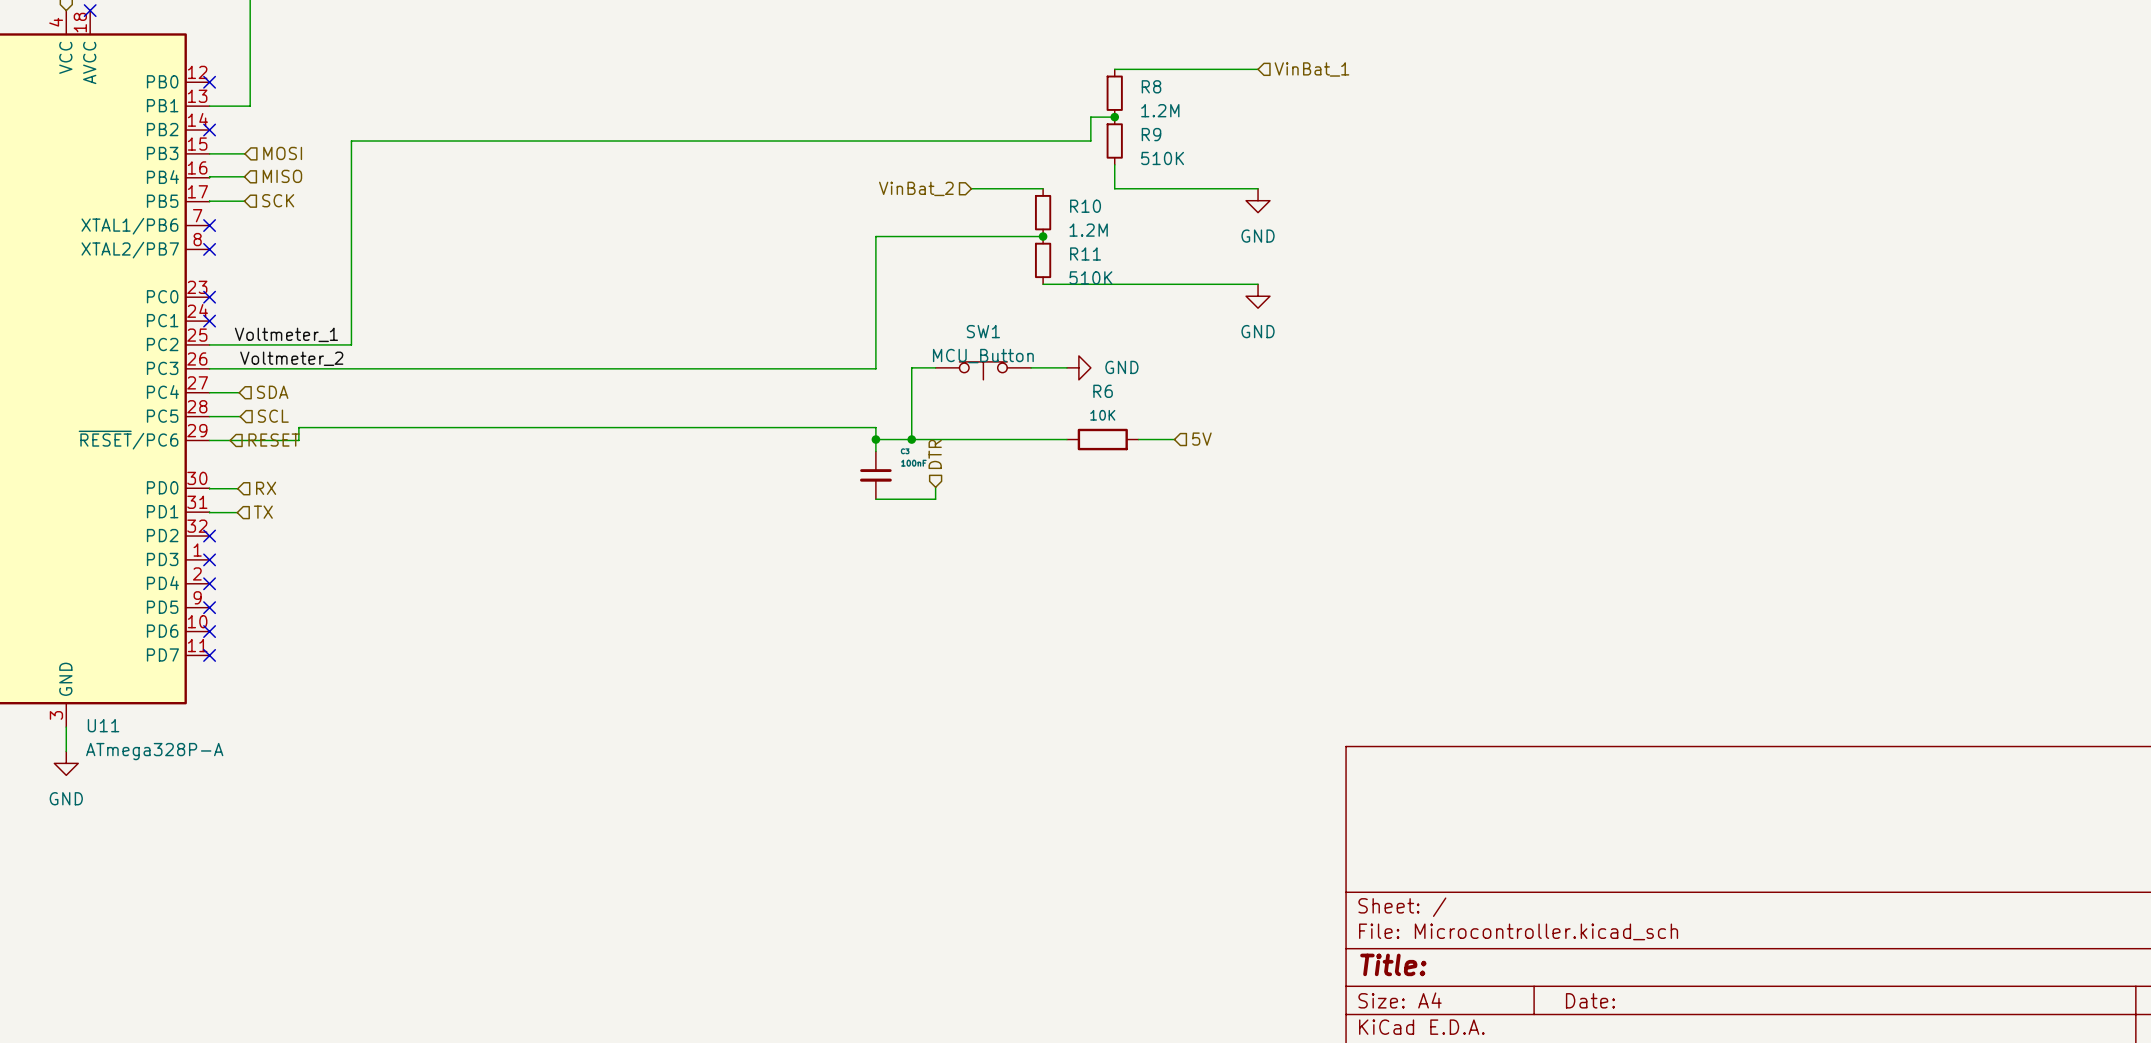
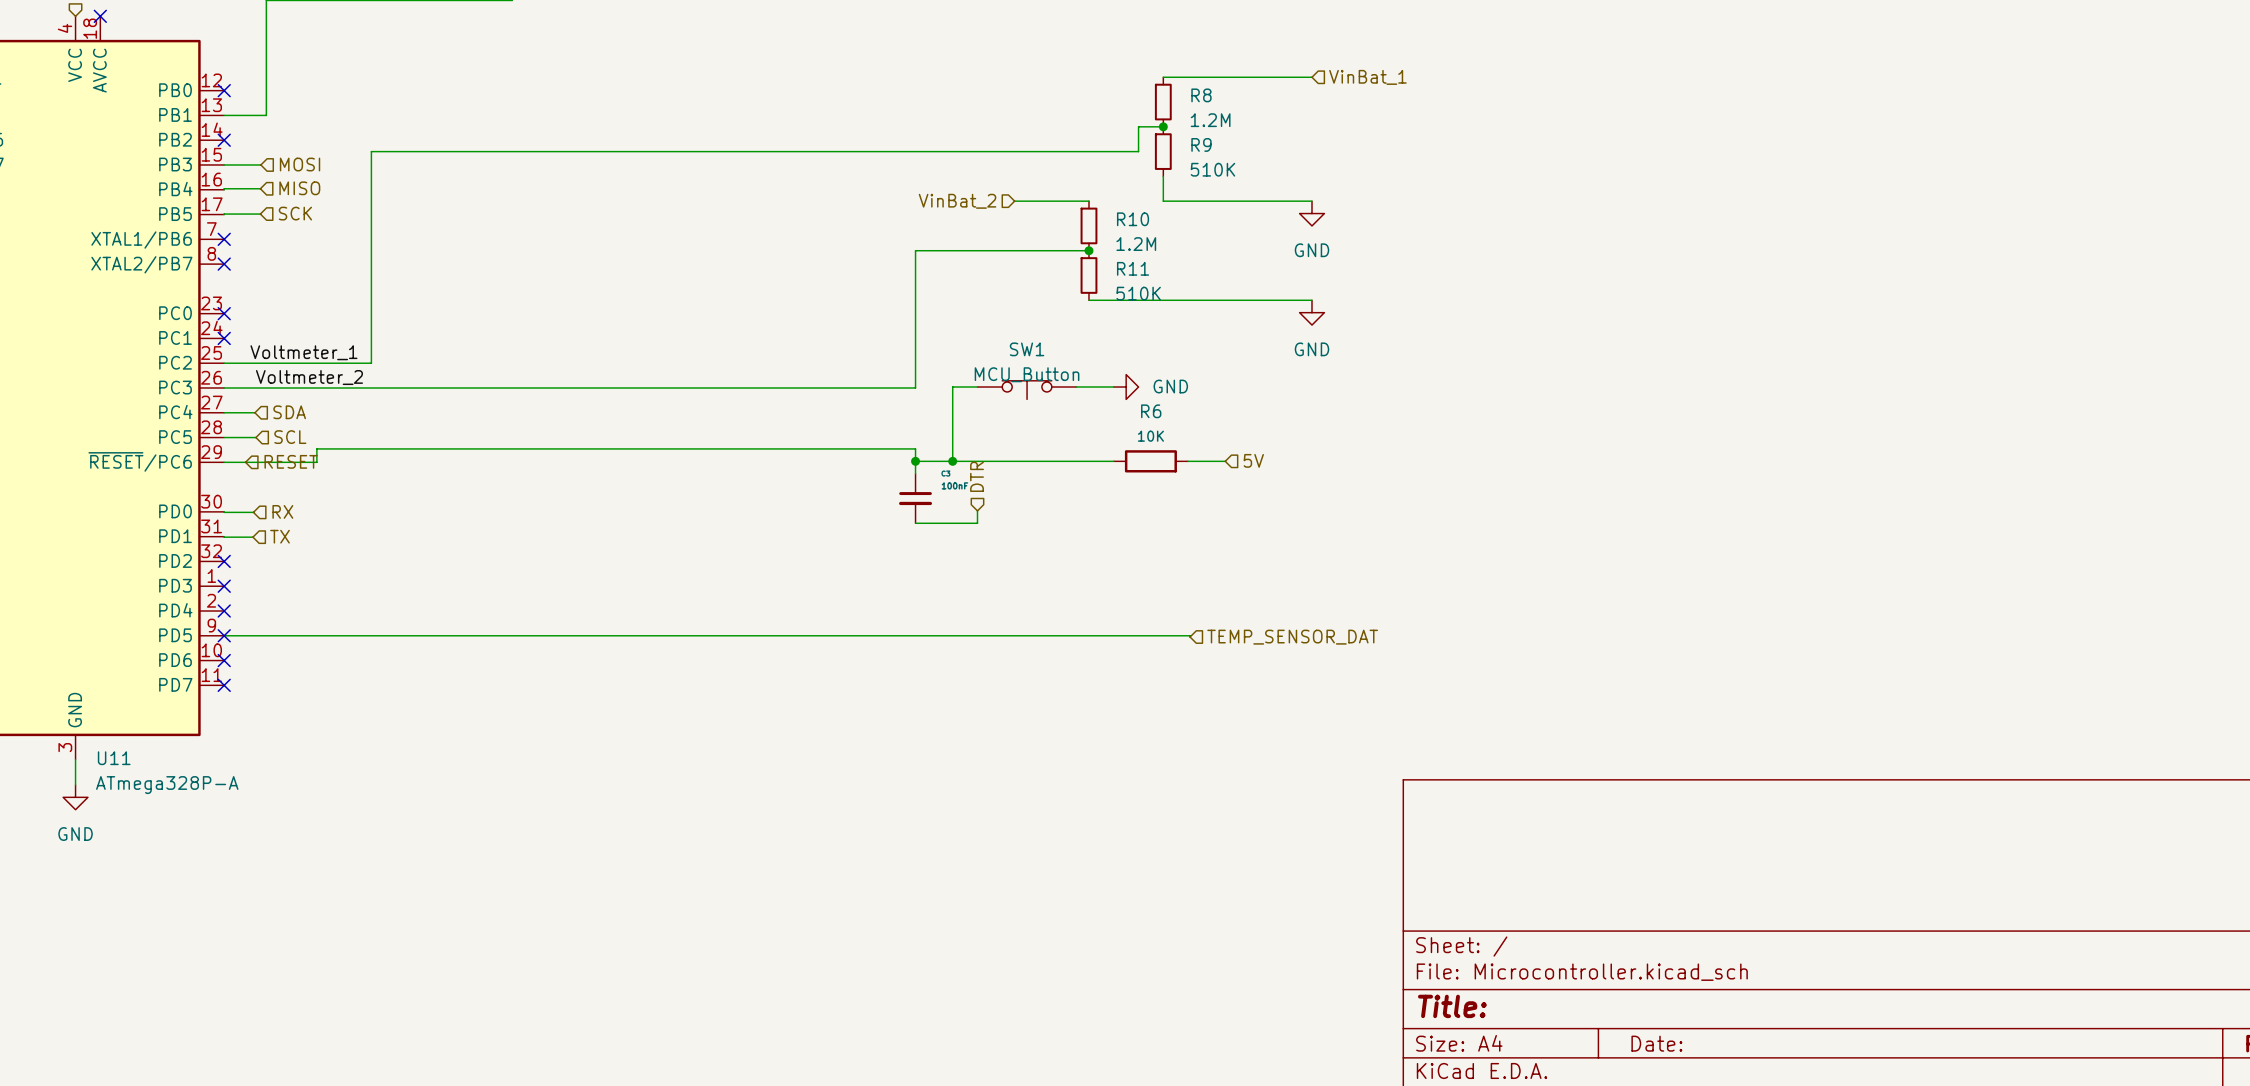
wire: none -> (224, 635) (1190, 637)
hierarchical label: none -> TEMP_SENSOR_DAT (1292, 637)

